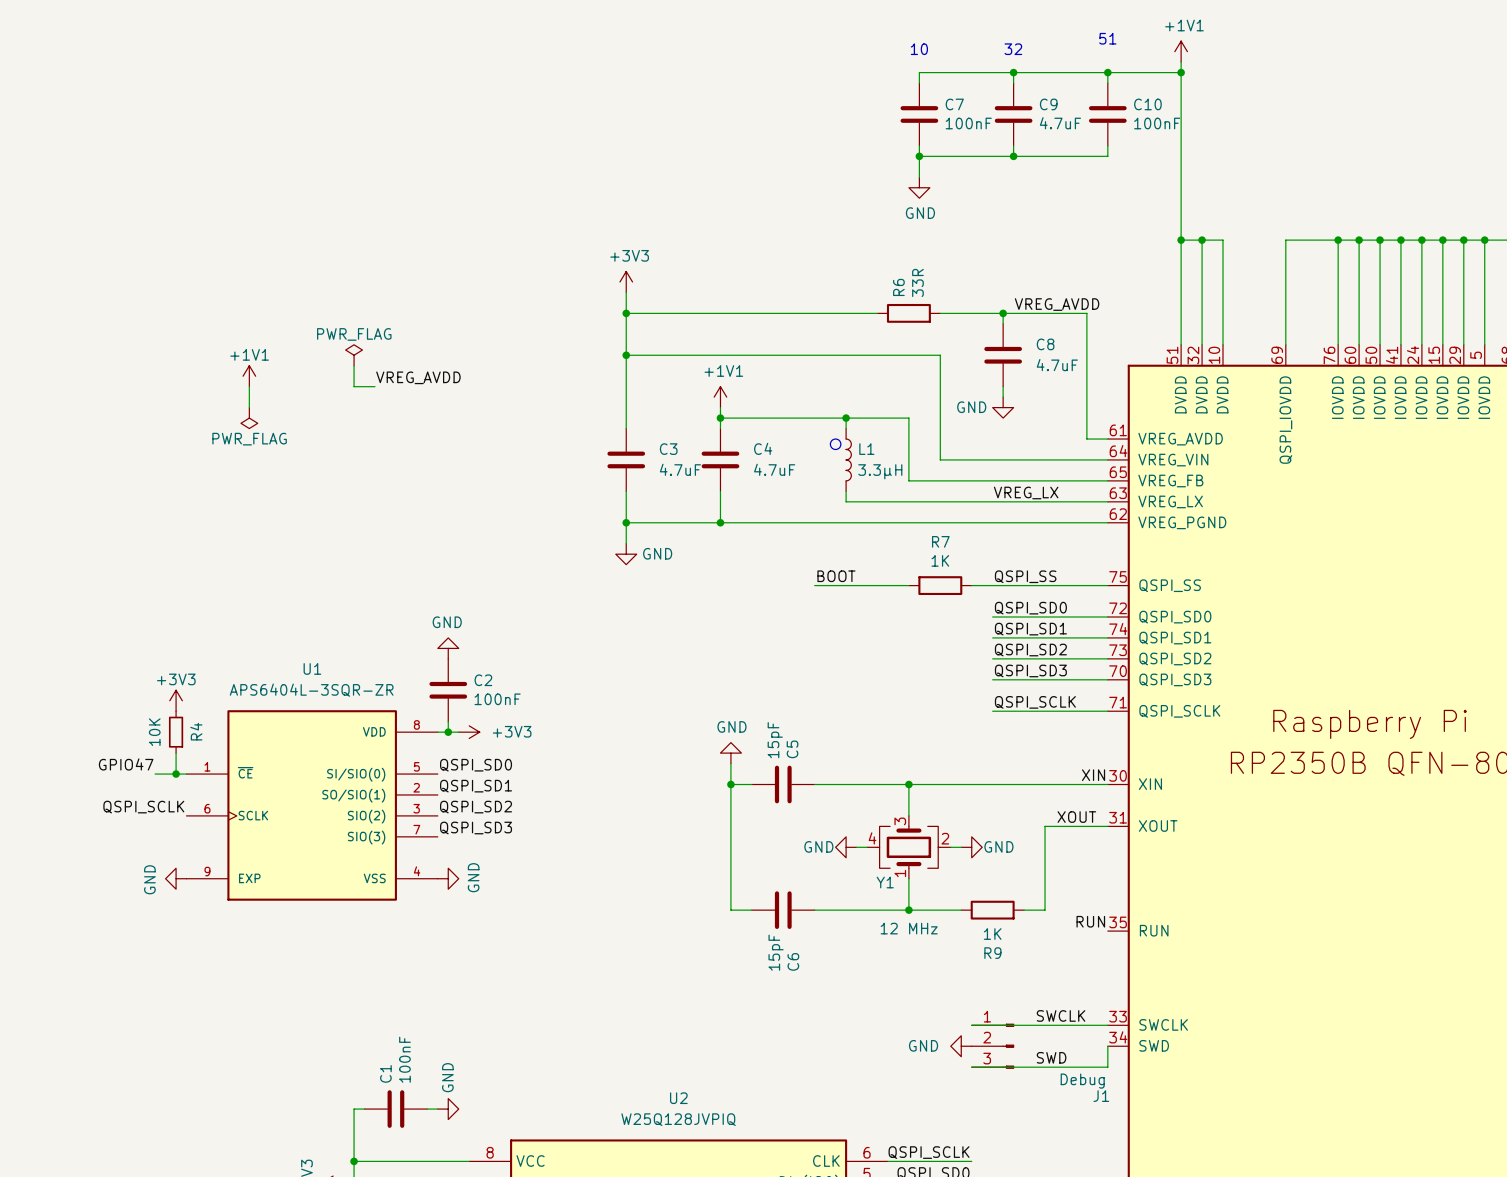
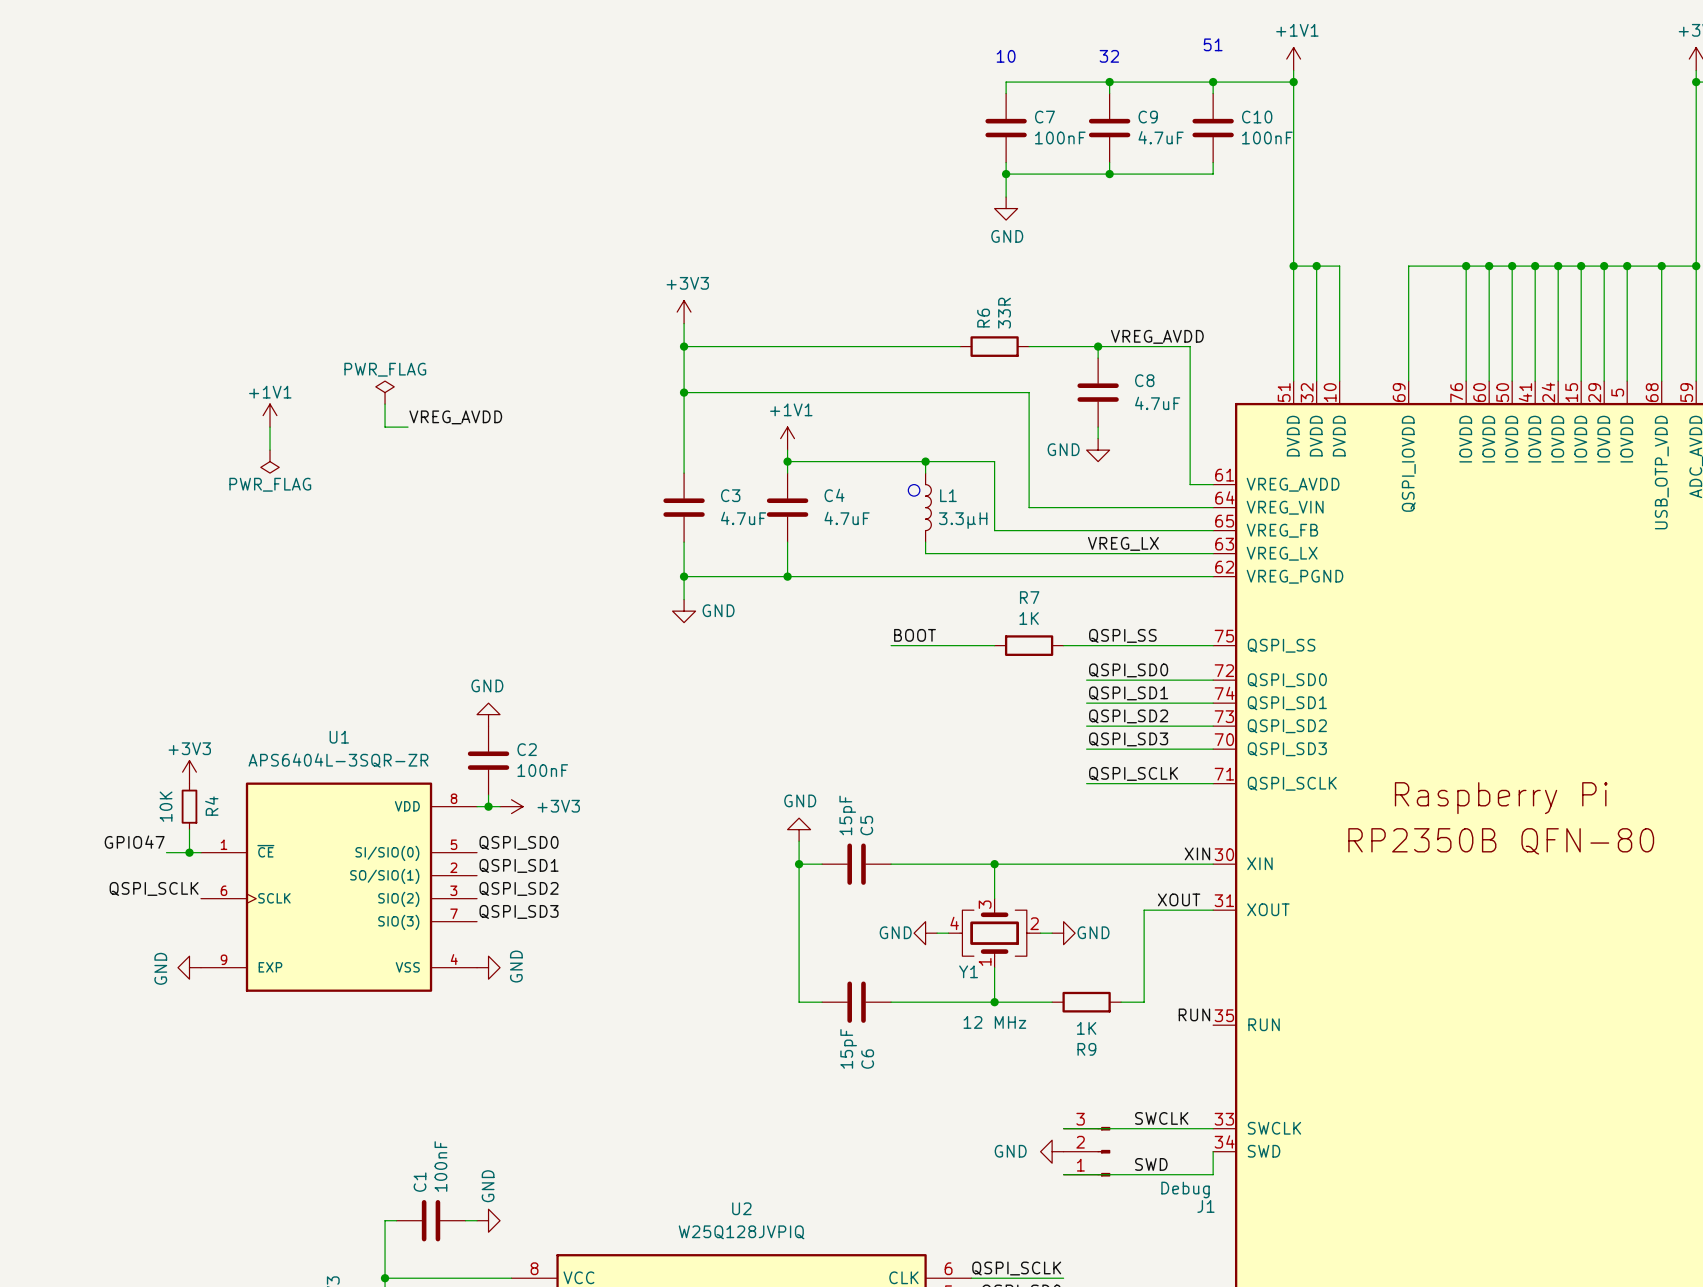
J1 flip: as is (1008, 1046) -> up-down (1103, 1151)

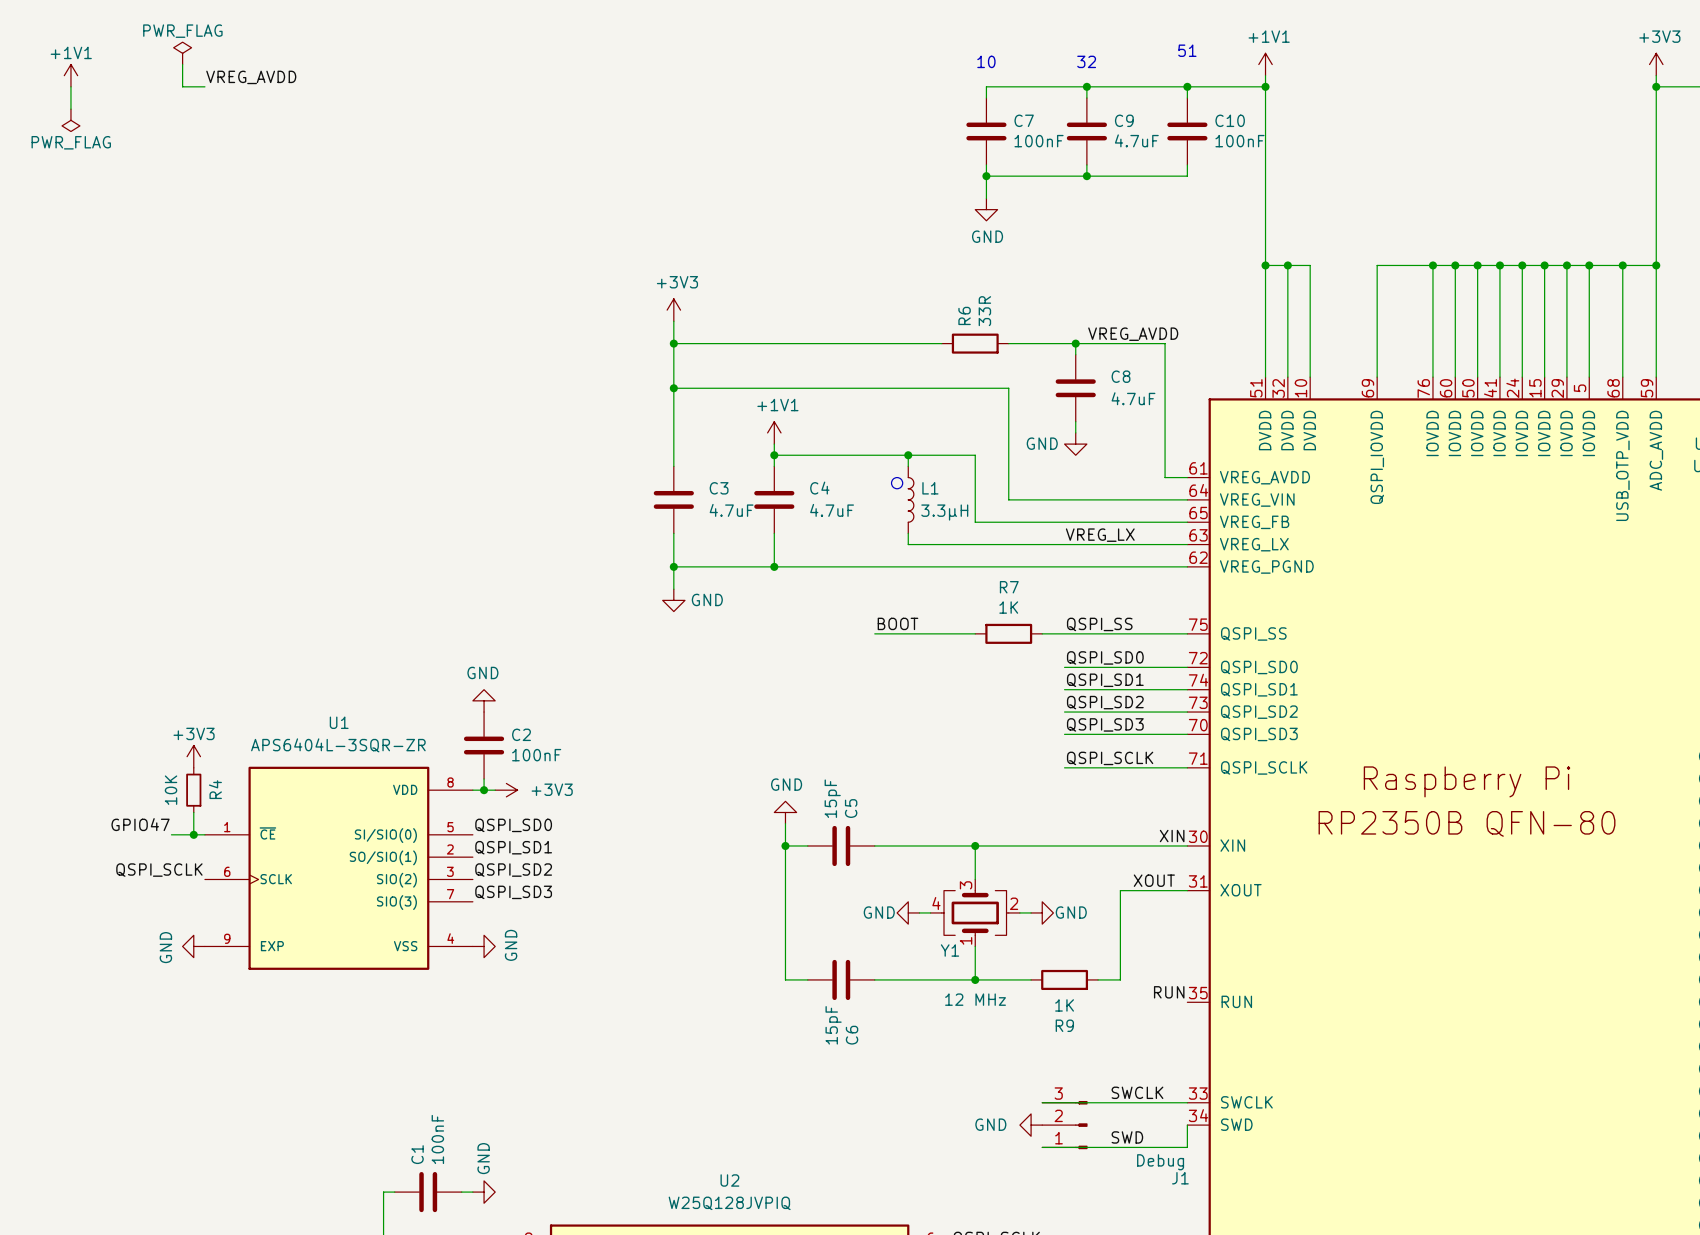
power symbol: none -> PWR_FLAG (182, 53)
wire: none -> (182, 64) (182, 86) (204, 86)
power symbol: none -> +1V1 (70, 75)
label: none -> VREG_AVDD (251, 77)
wire: none -> (70, 86) (70, 109)
power symbol: none -> PWR_FLAG (70, 120)
power symbol: PWR_FLAG (385, 392) -> none
wire: (385, 404) (385, 427) (408, 427) -> none
power symbol: +1V1 (270, 415) -> none
label: VREG_AVDD (455, 417) -> none
wire: (270, 427) (270, 450) -> none
power symbol: PWR_FLAG (270, 461) -> none

